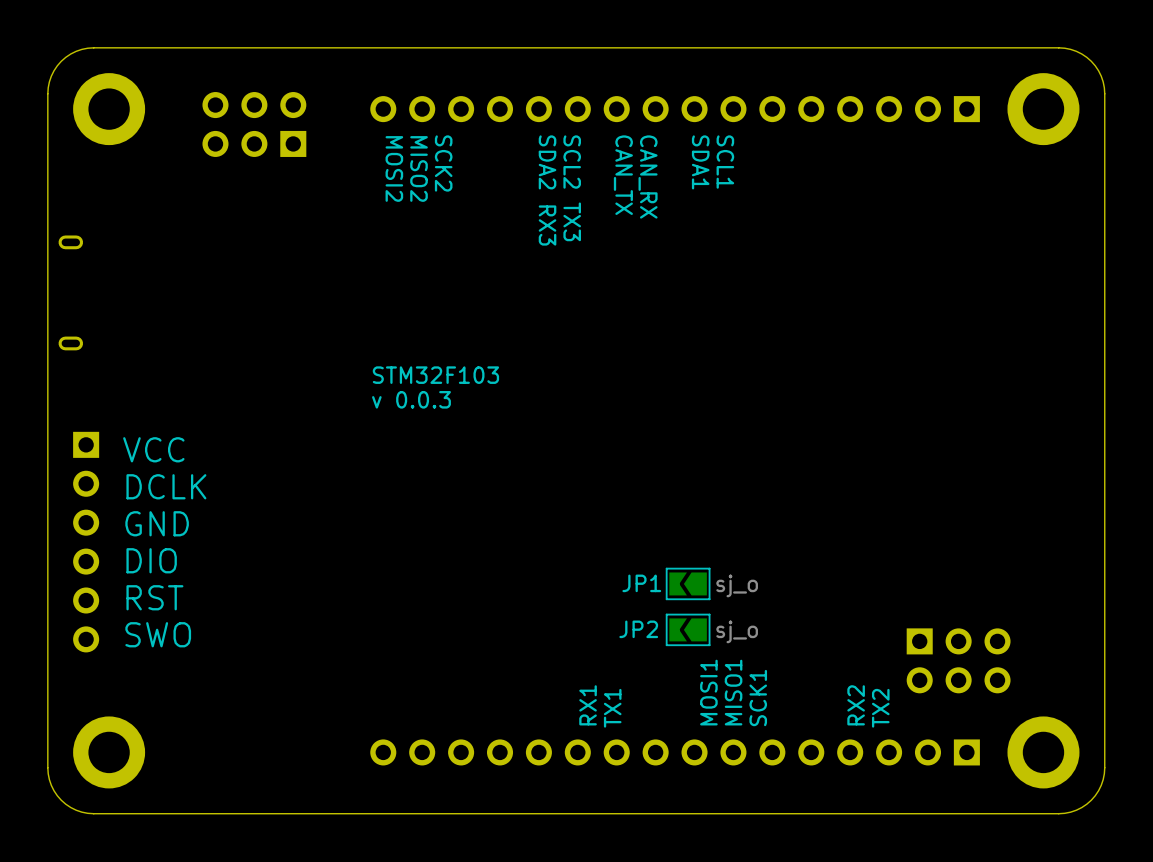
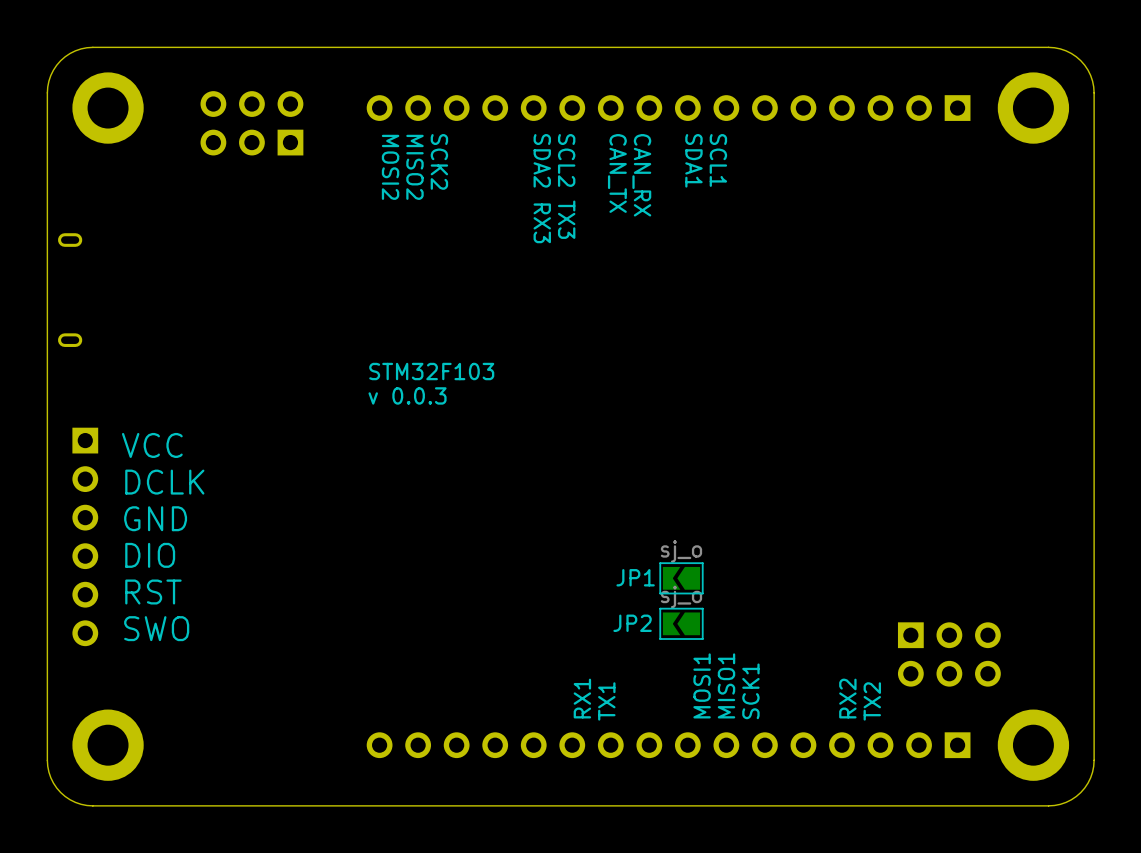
JP1 value position: sj_o (737, 585) -> sj_o (681, 551)
JP2 value position: sj_o (737, 631) -> sj_o (681, 596)

